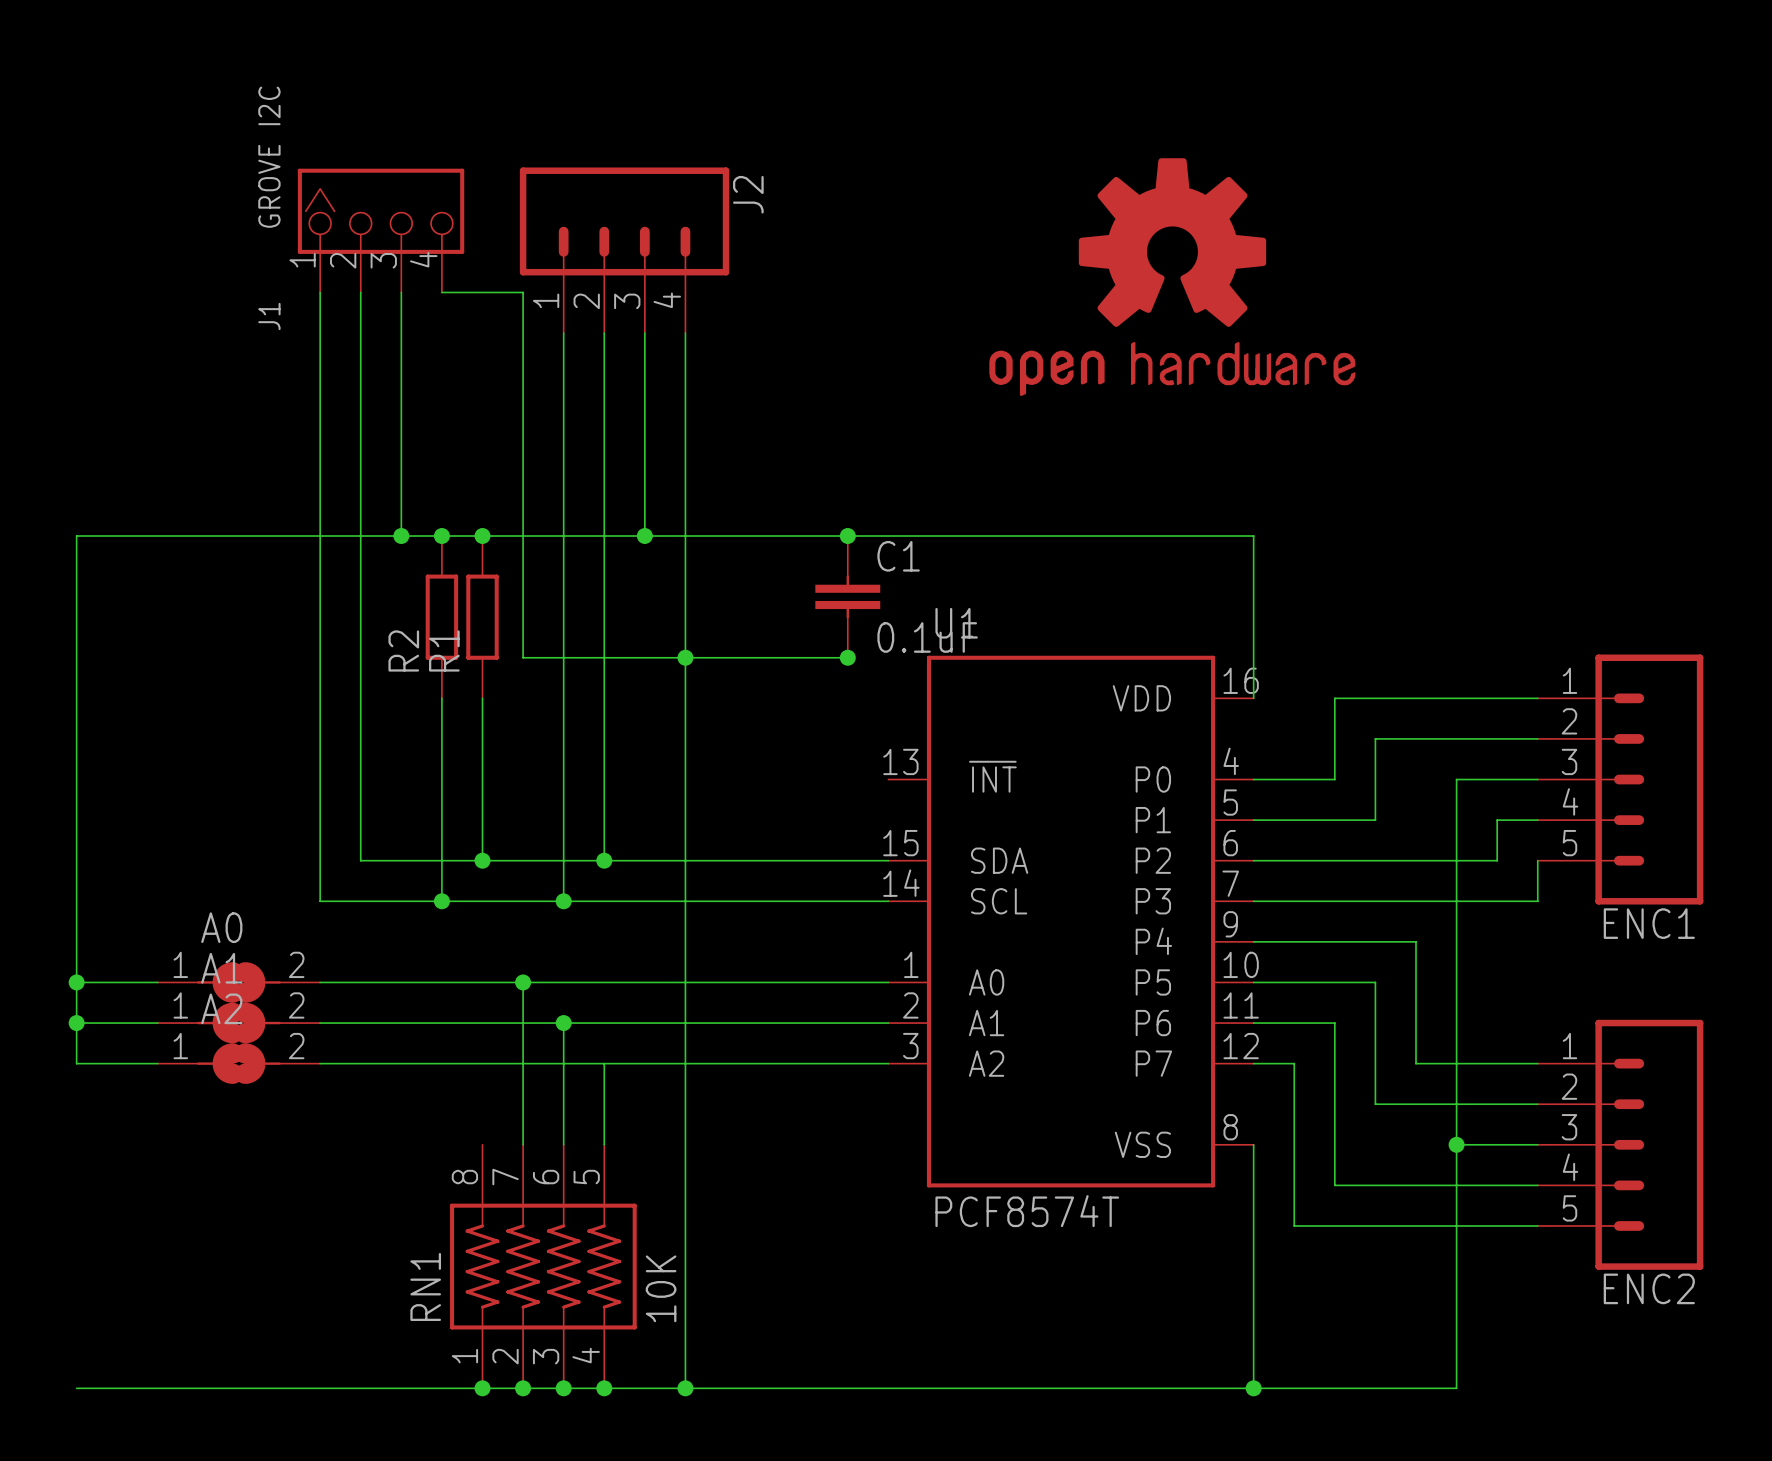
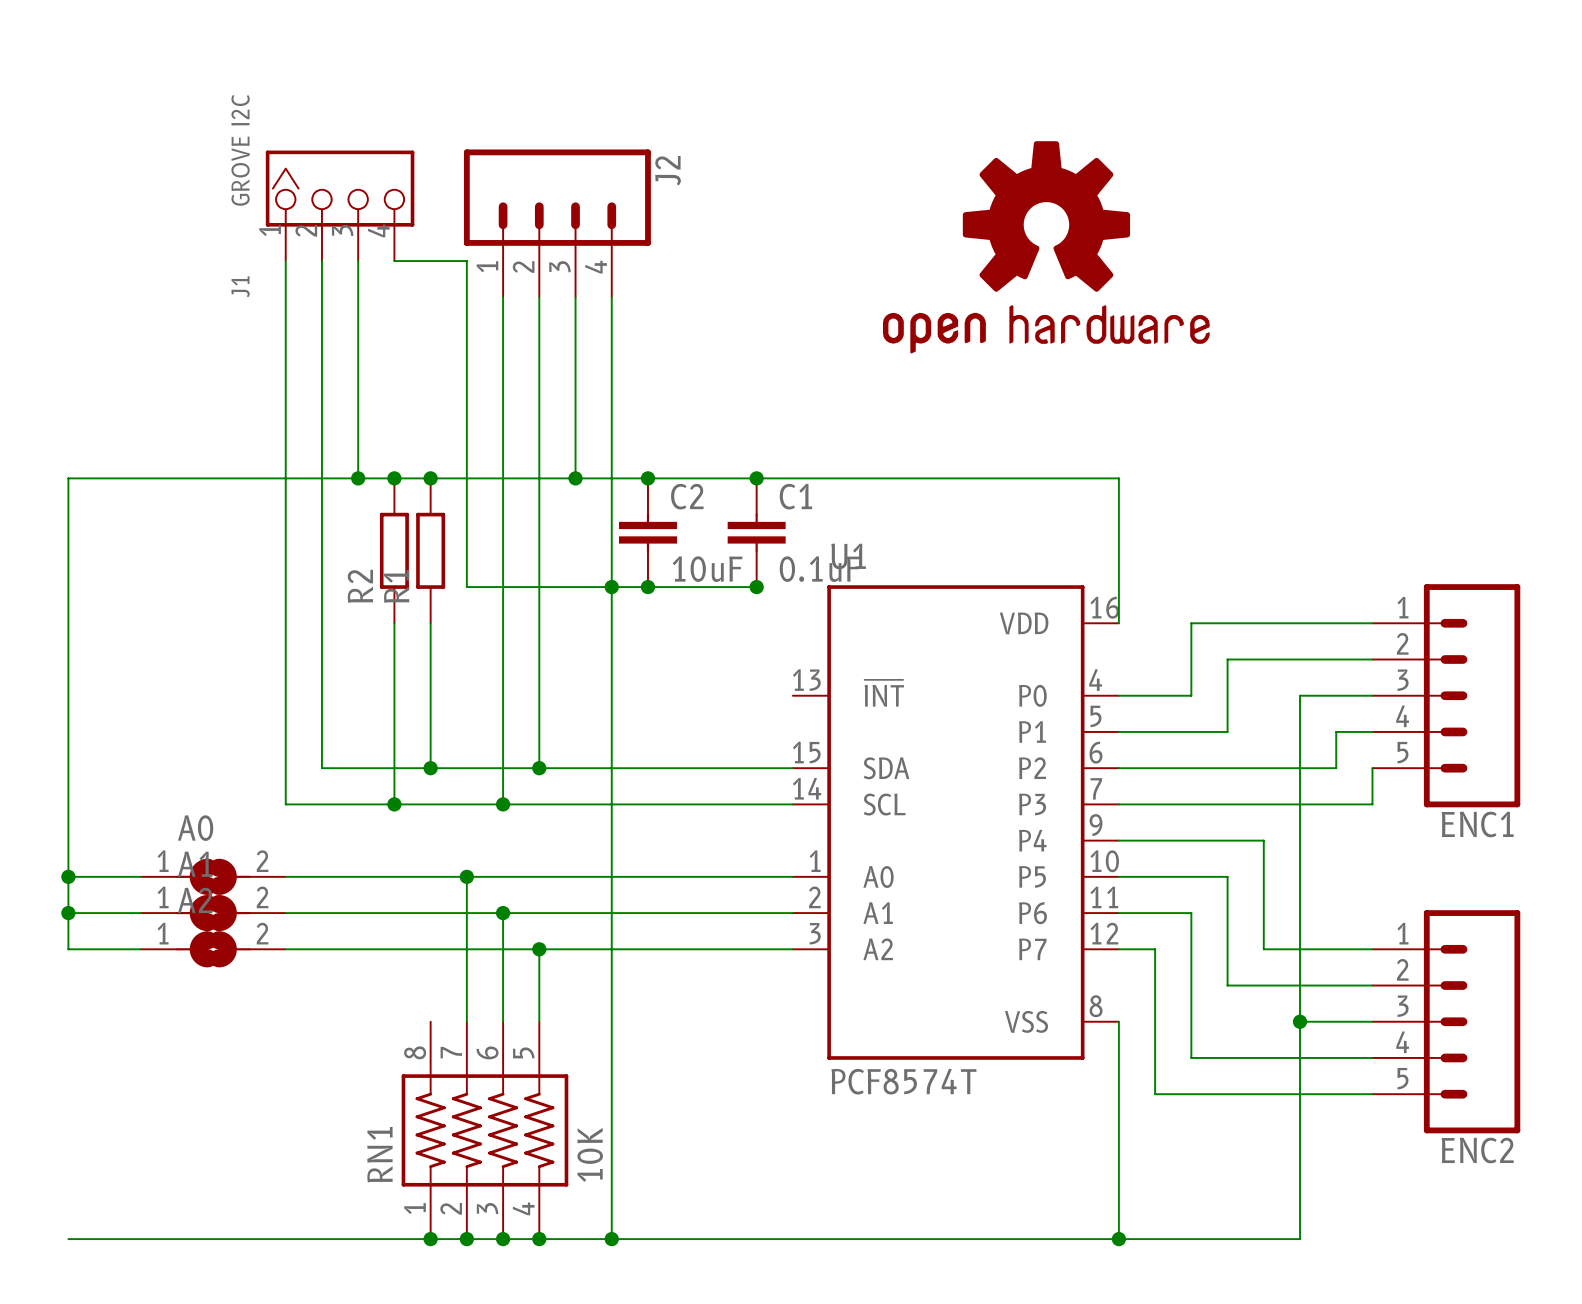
junction: none -> (647, 478)
C2: none -> 10uF (647, 532)
junction: none -> (647, 587)
junction: none -> (539, 949)

